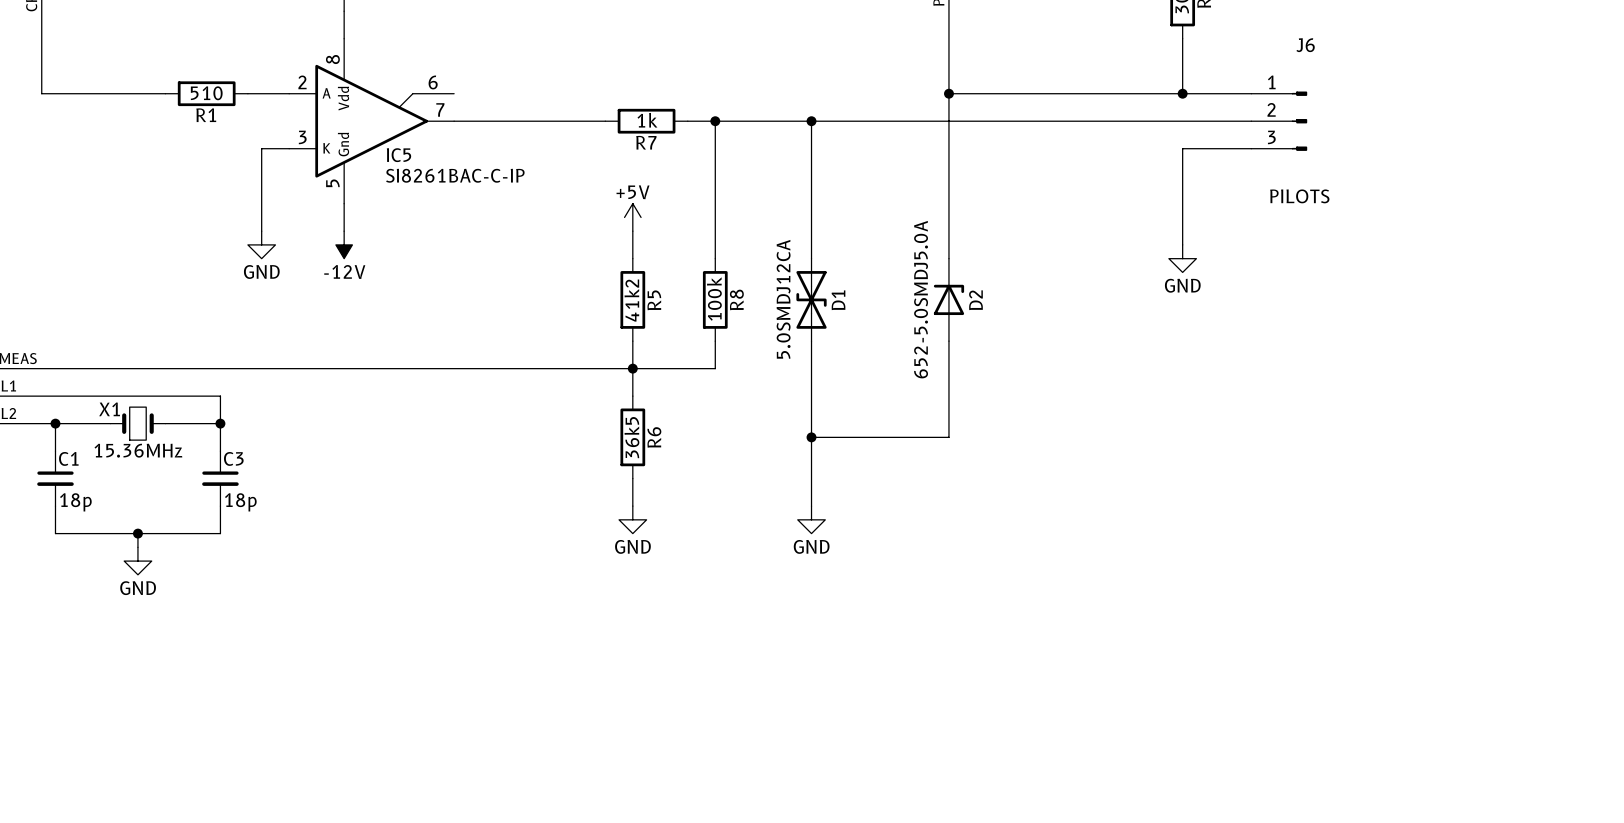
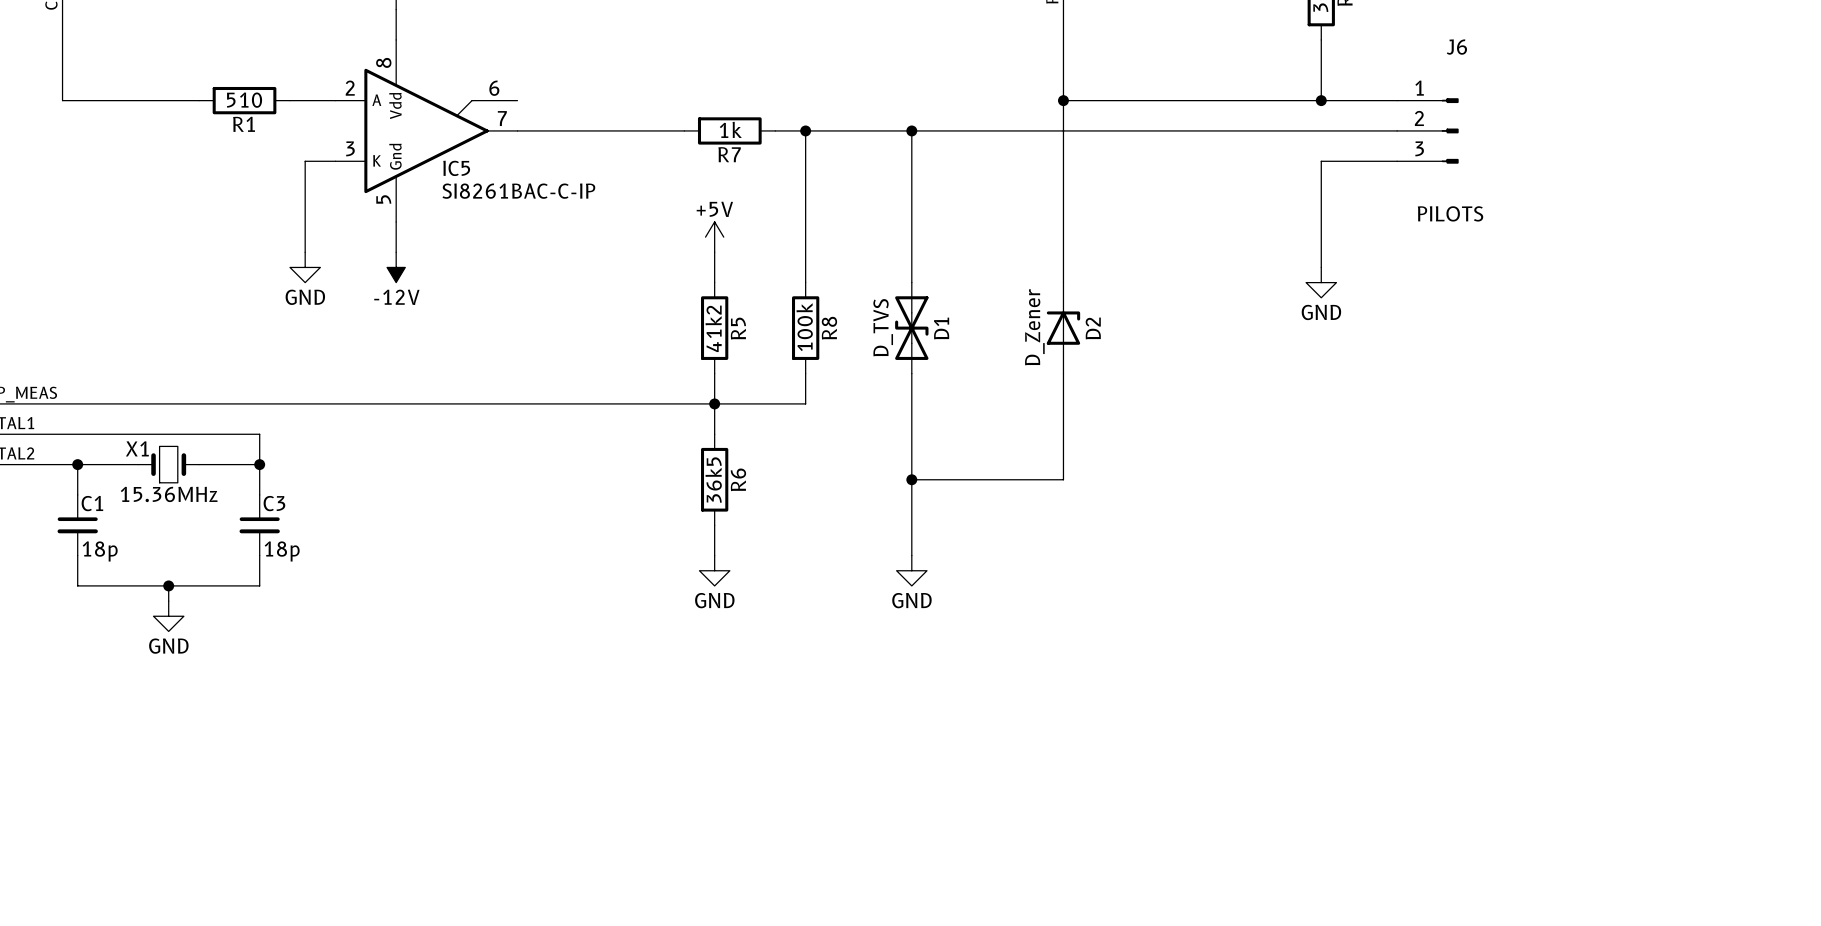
D1 value: 5.0SMDJ12CA (783, 299) -> D_TVS (883, 327)
D2 value: 652-5.0SMDJ5.0A (921, 299) -> D_Zener (1034, 327)

